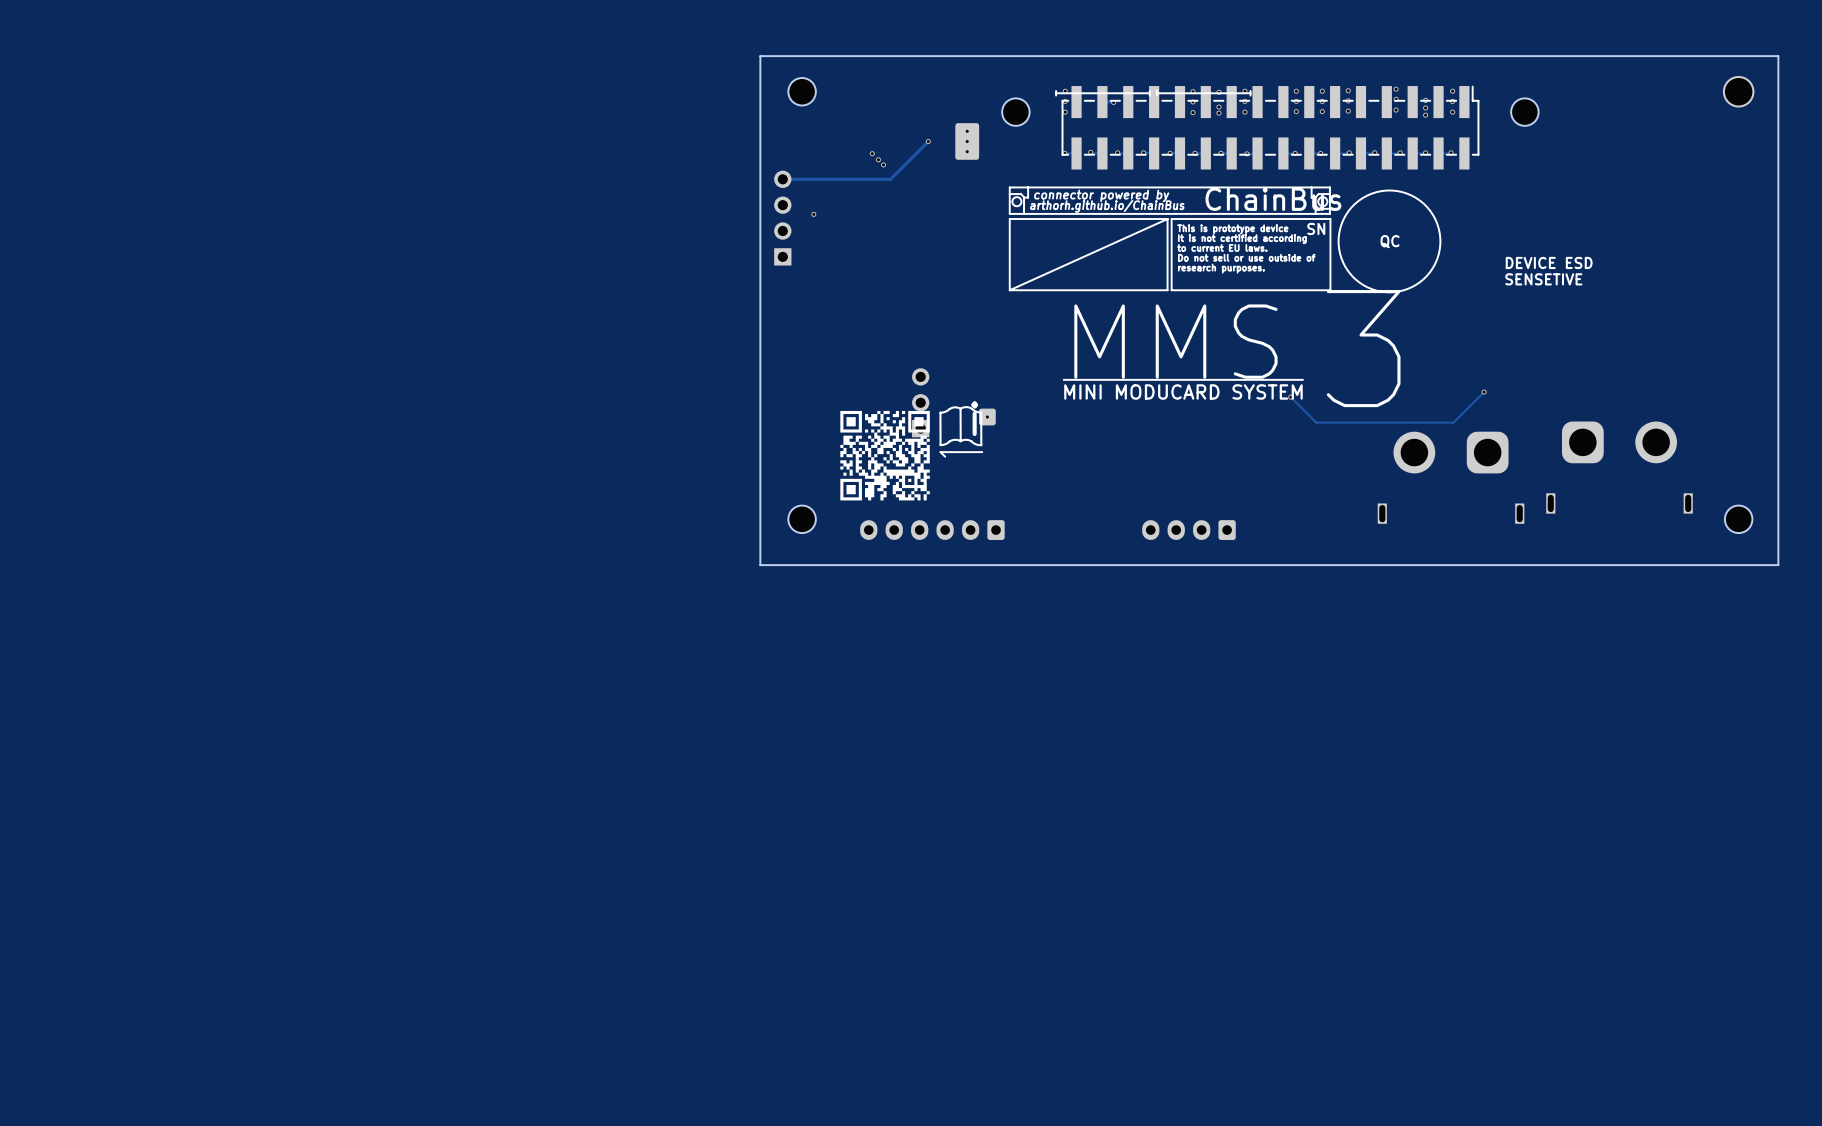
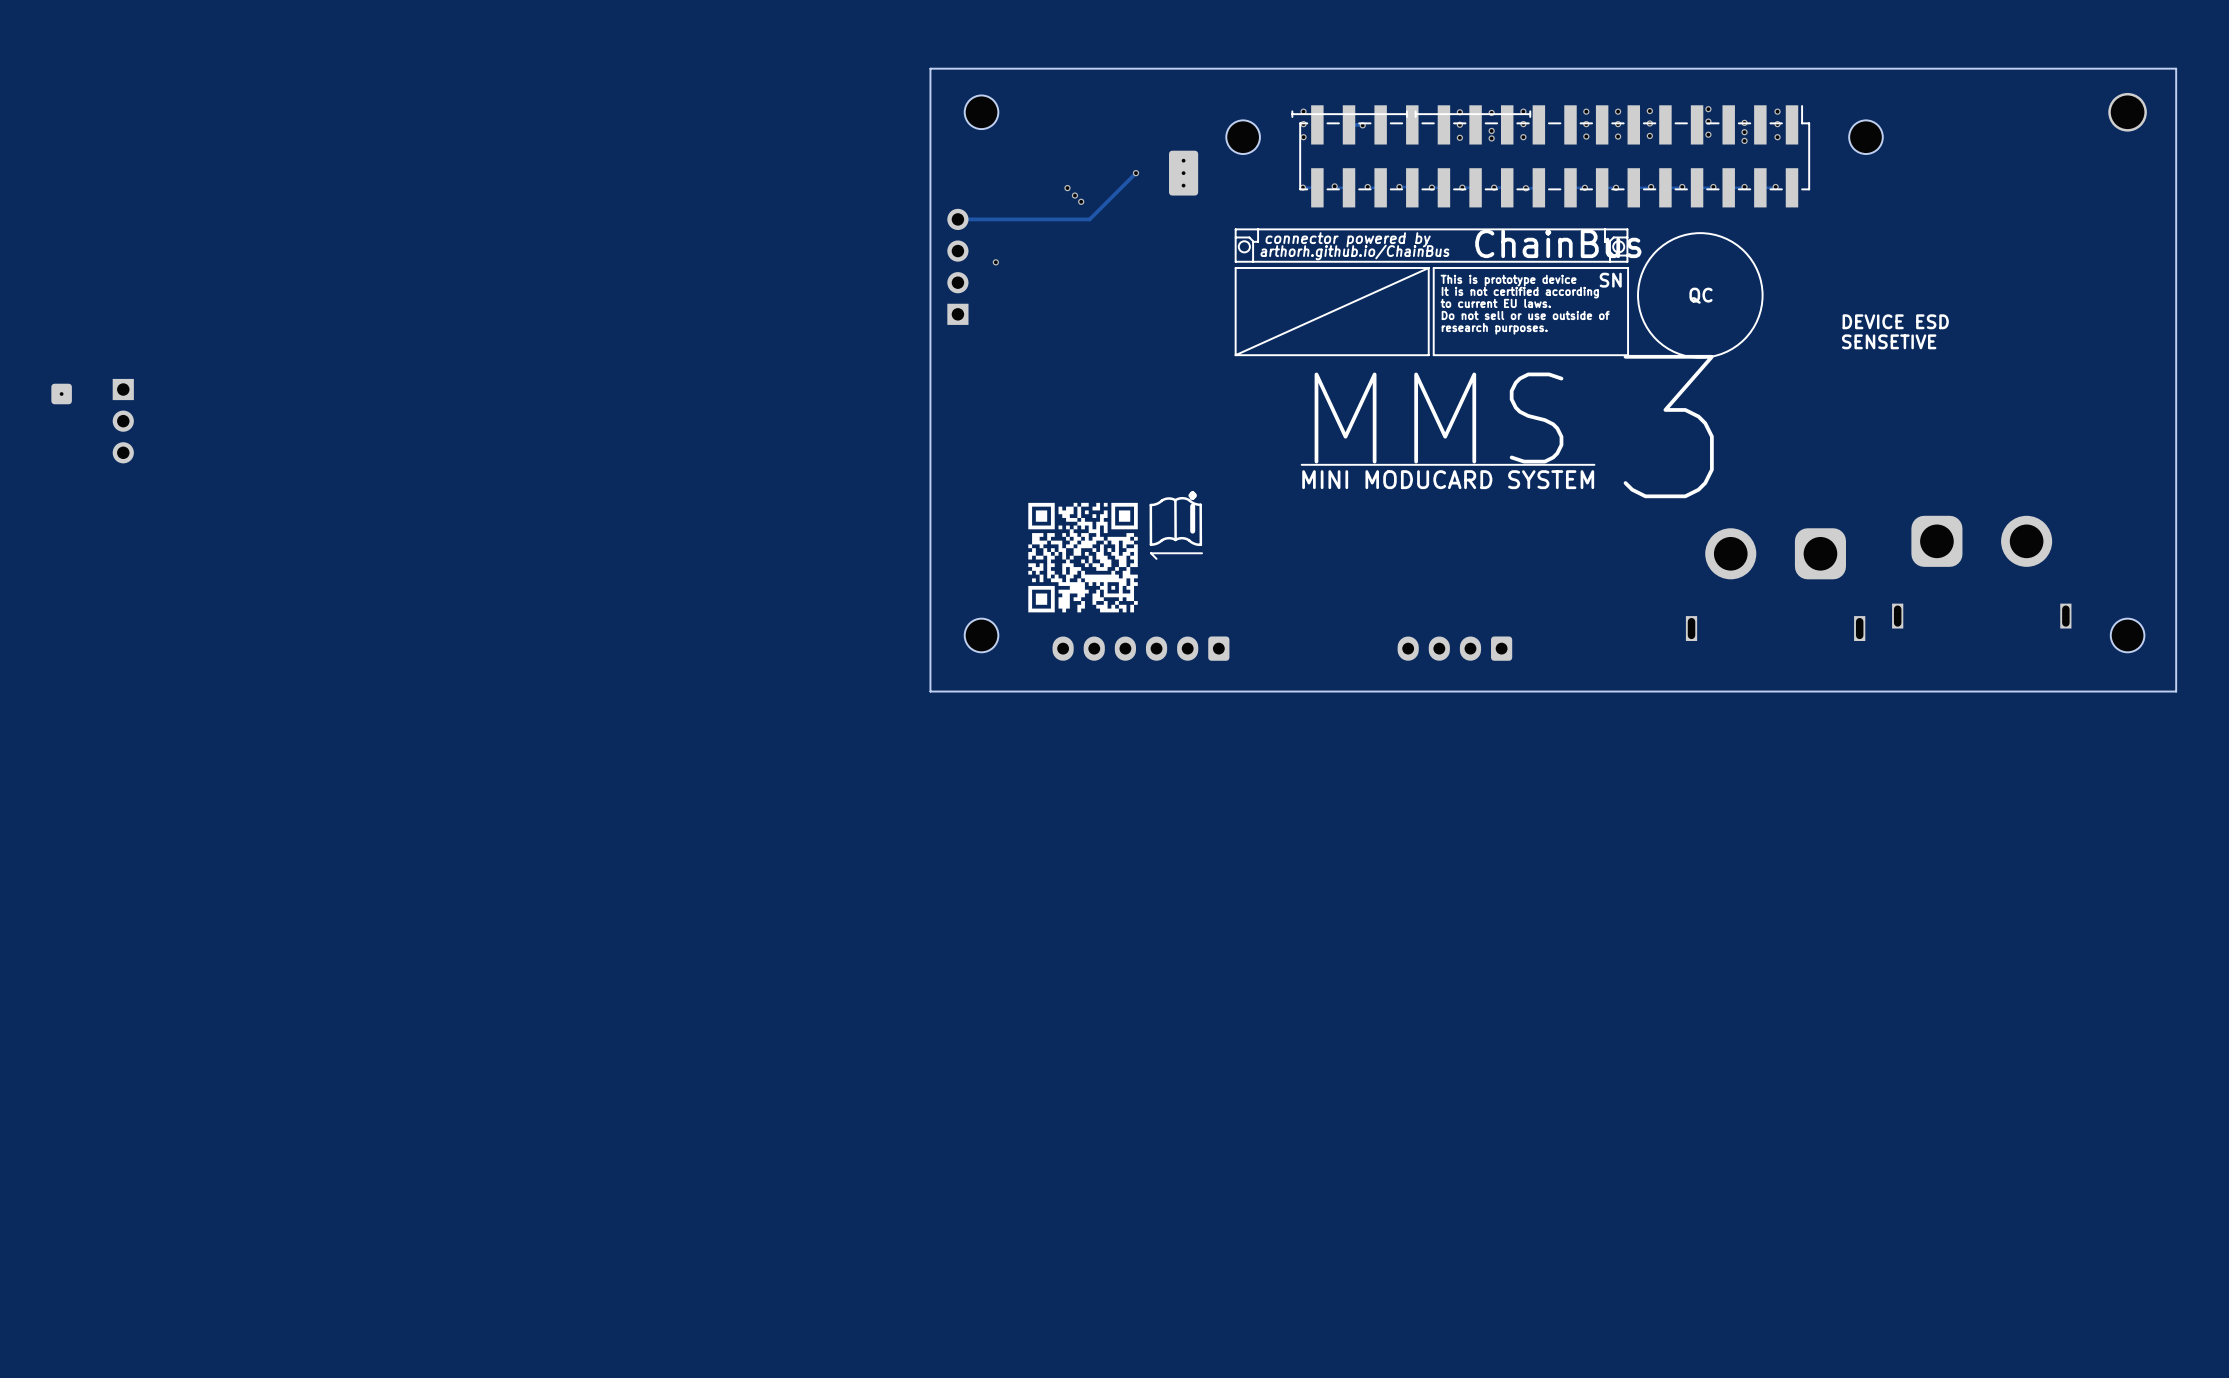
part: none -> (61, 394)
part: none -> (123, 421)
track: (1484, 392) (1453, 422) (1316, 422) (1290, 397) -> none
via: (1484, 392) -> none
via: (1290, 397) -> none
part: (920, 402) -> none
part: (987, 417) -> none

